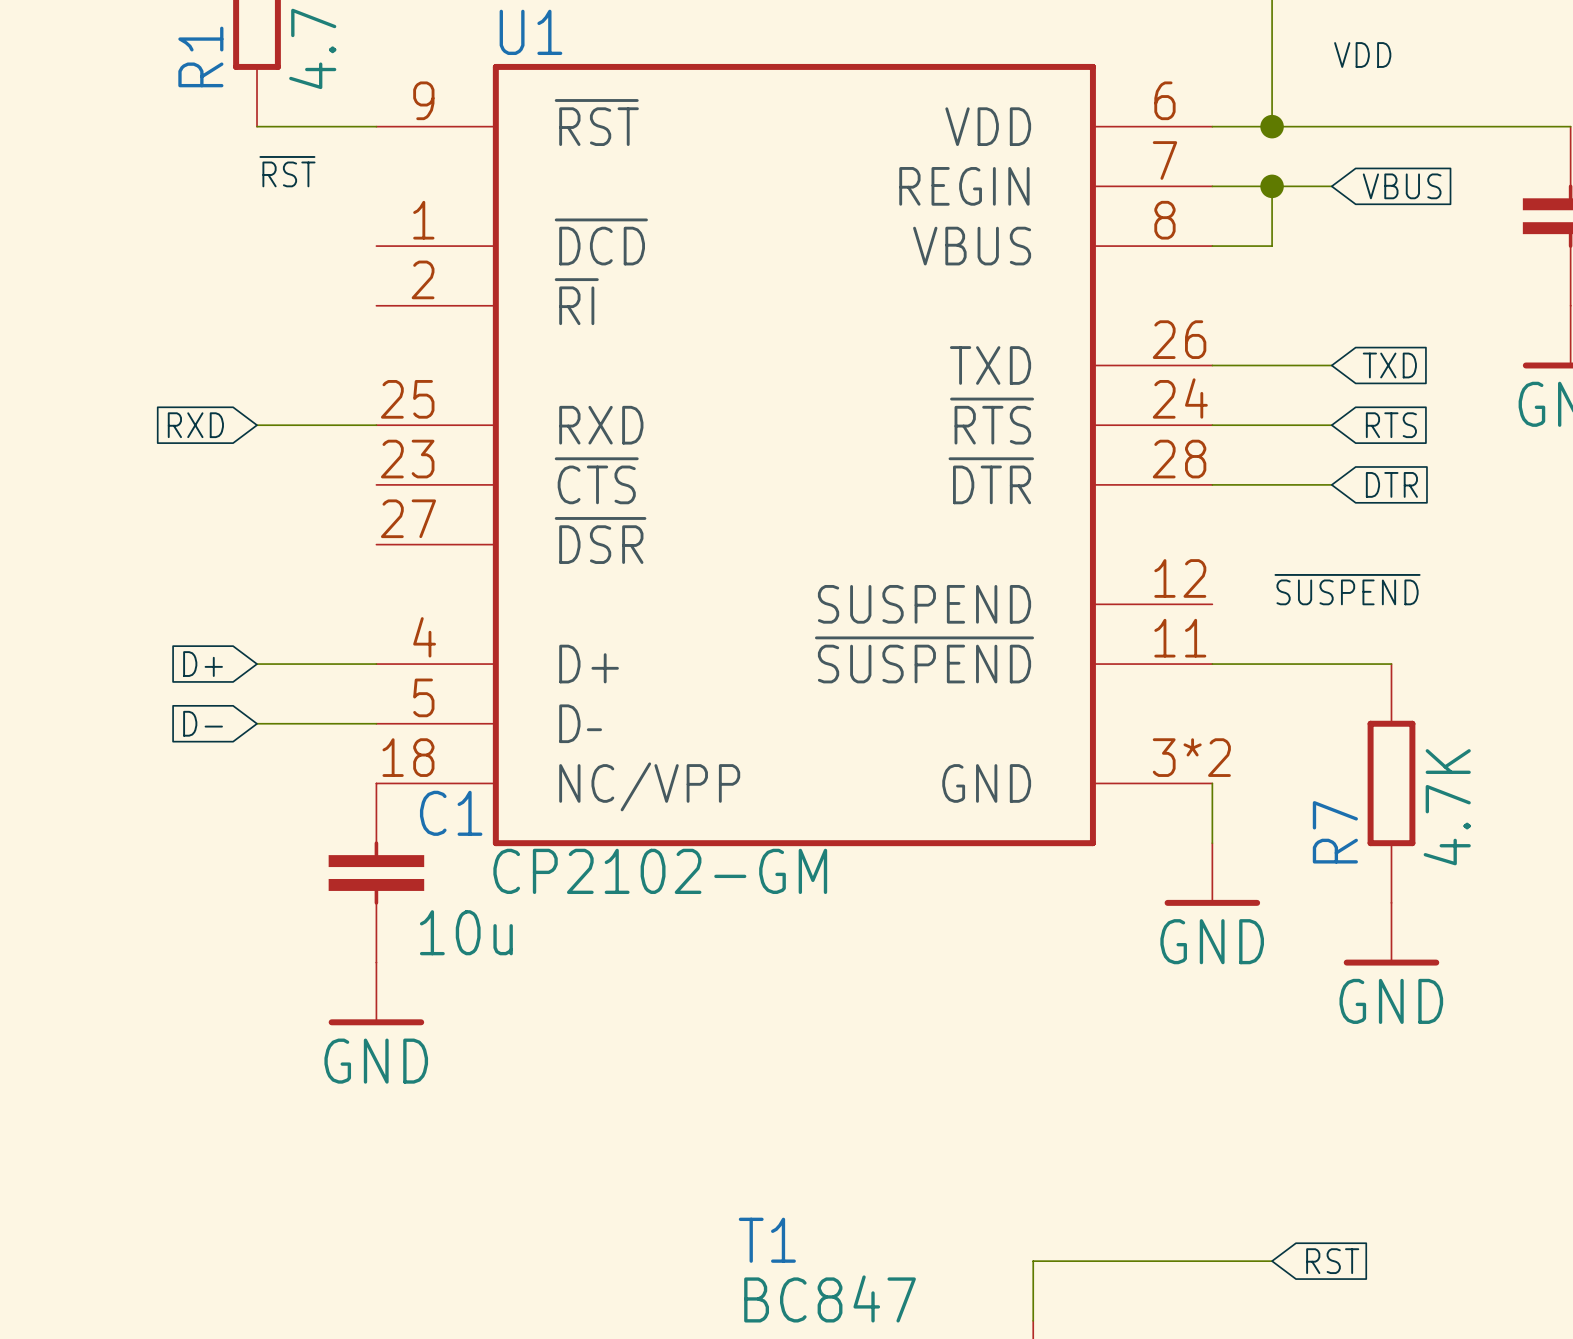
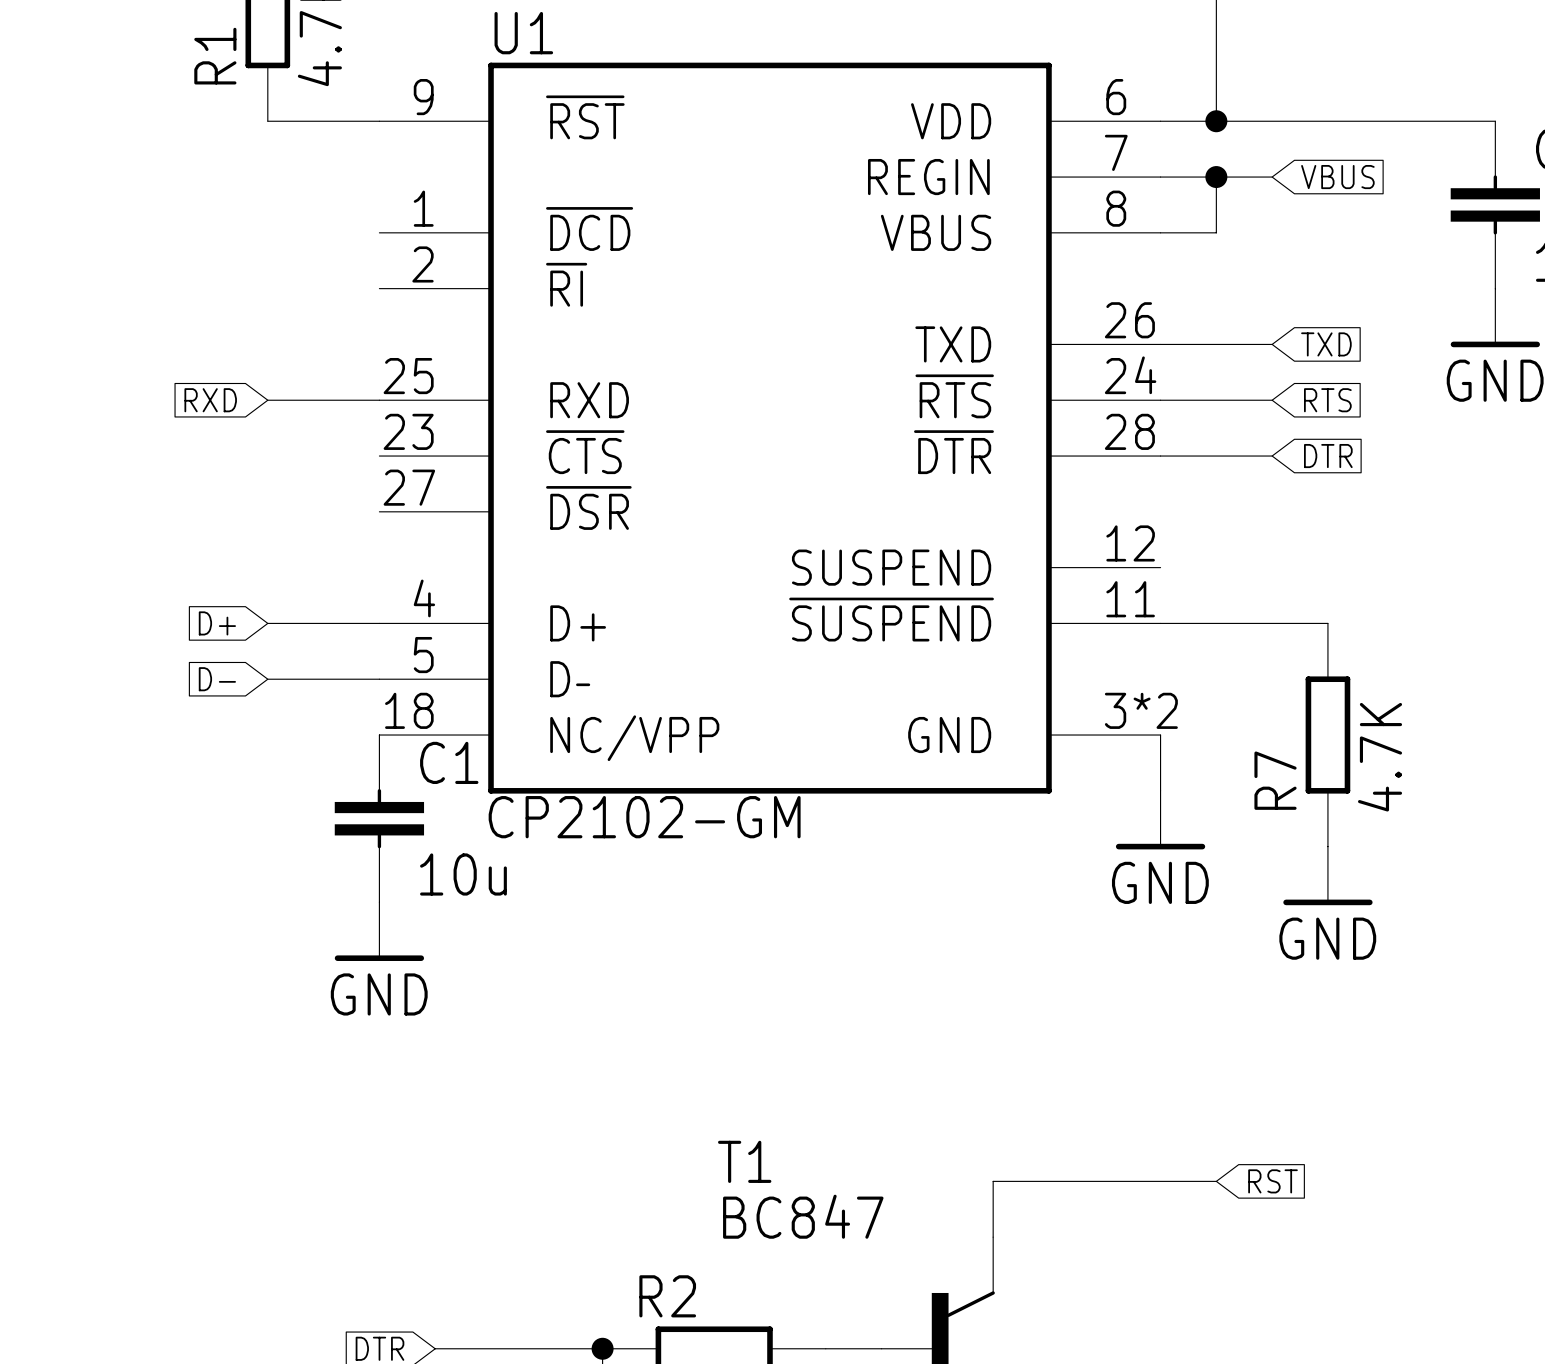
label: VDD (1362, 55) -> none
label: ~{RST} (287, 171) -> none
label: ~{SUSPEND} (1347, 589) -> none

